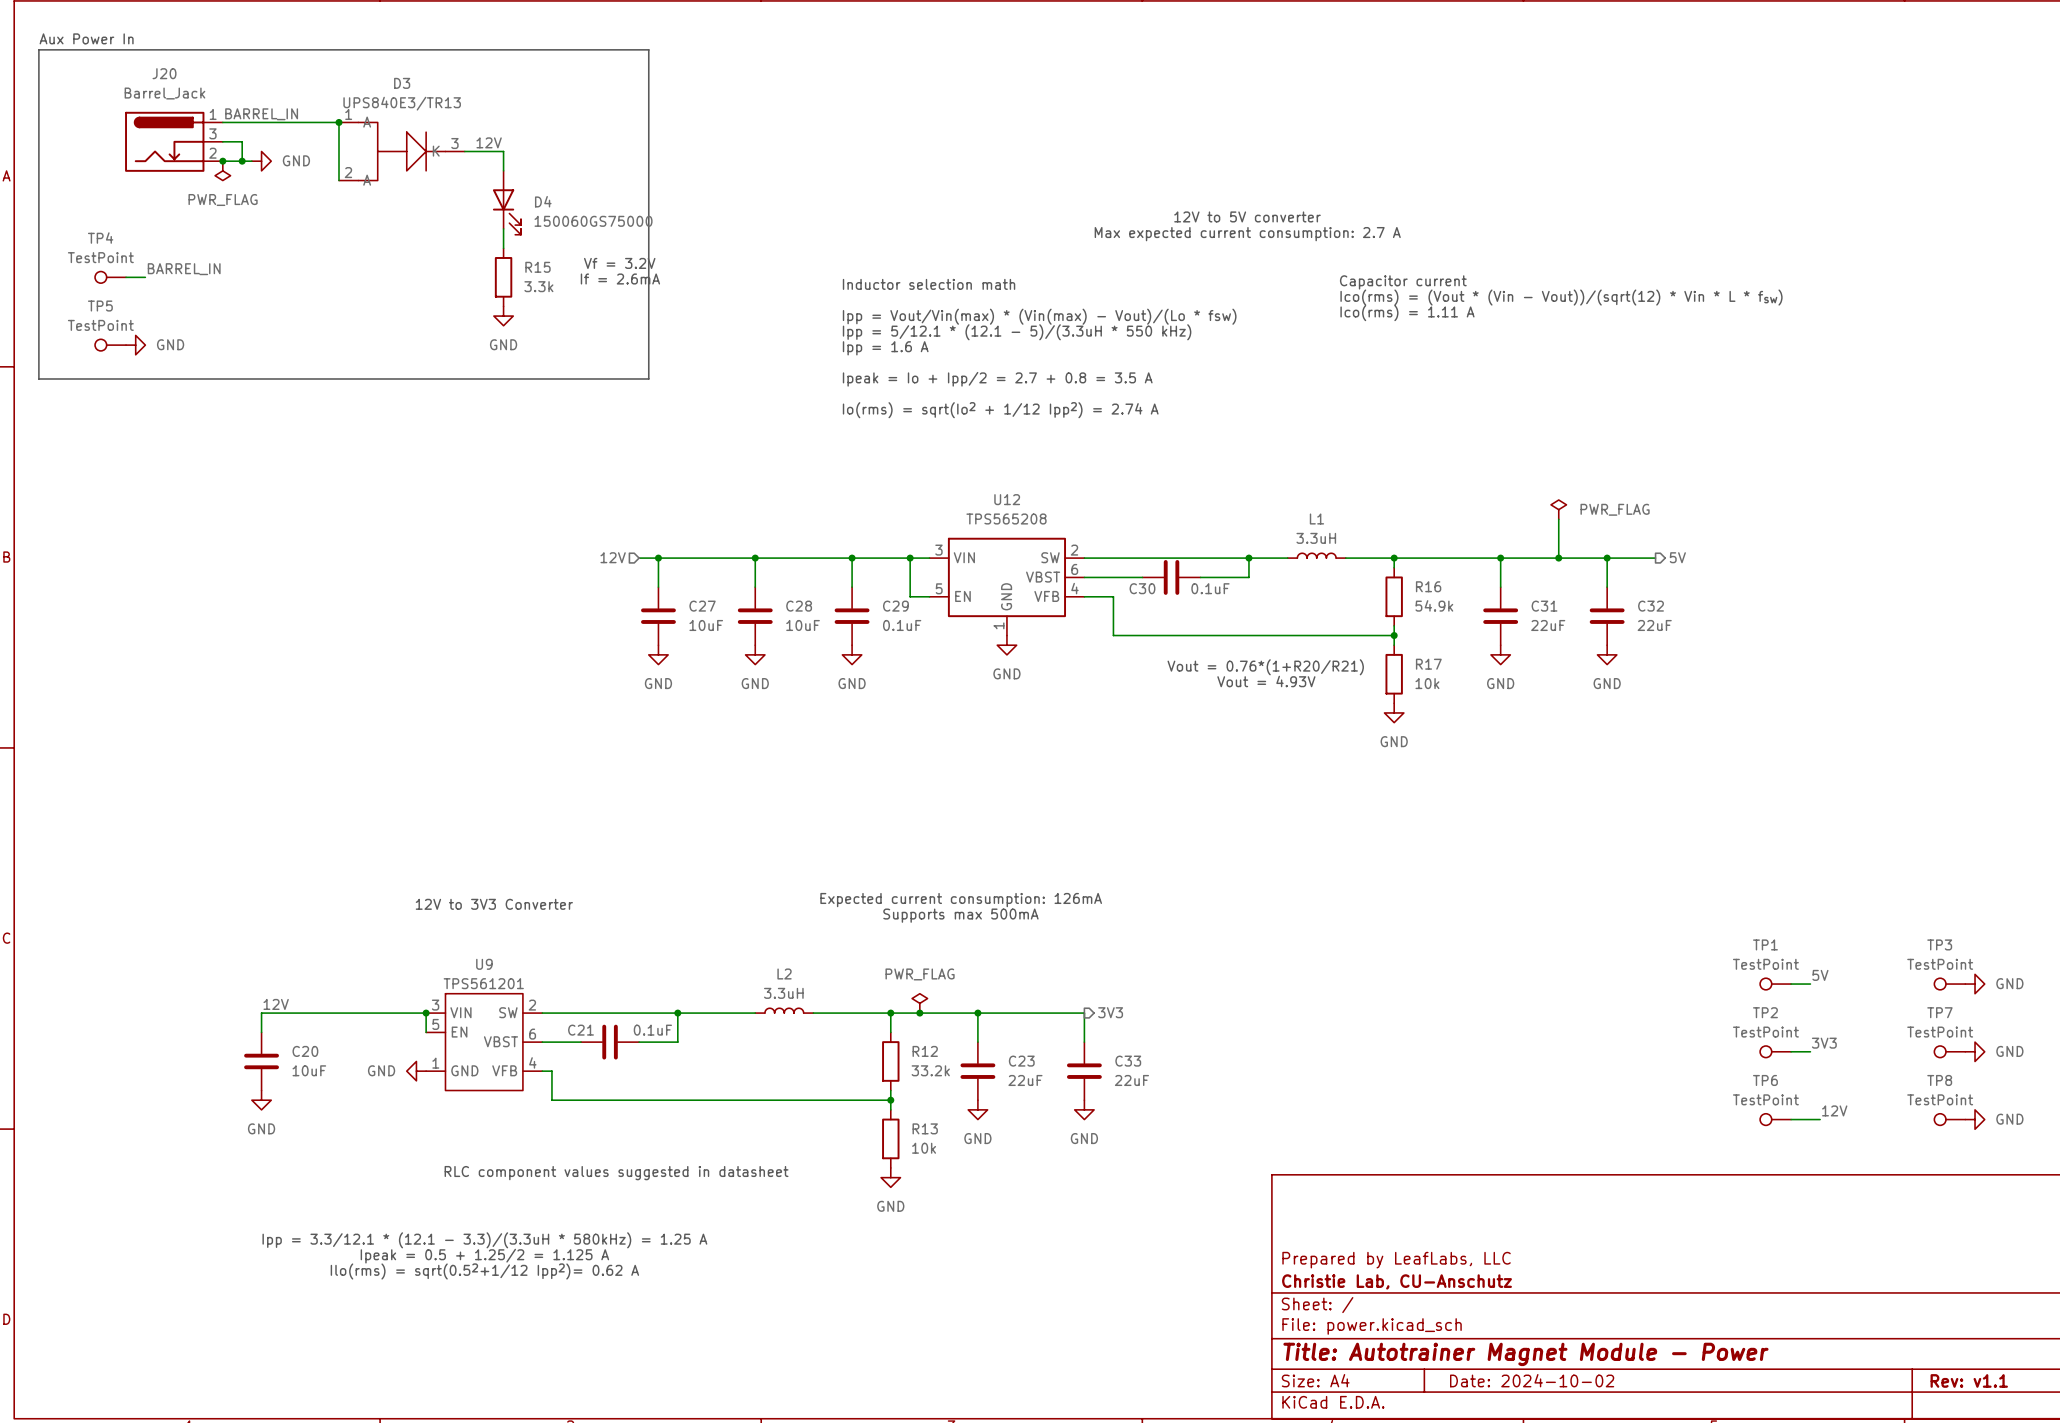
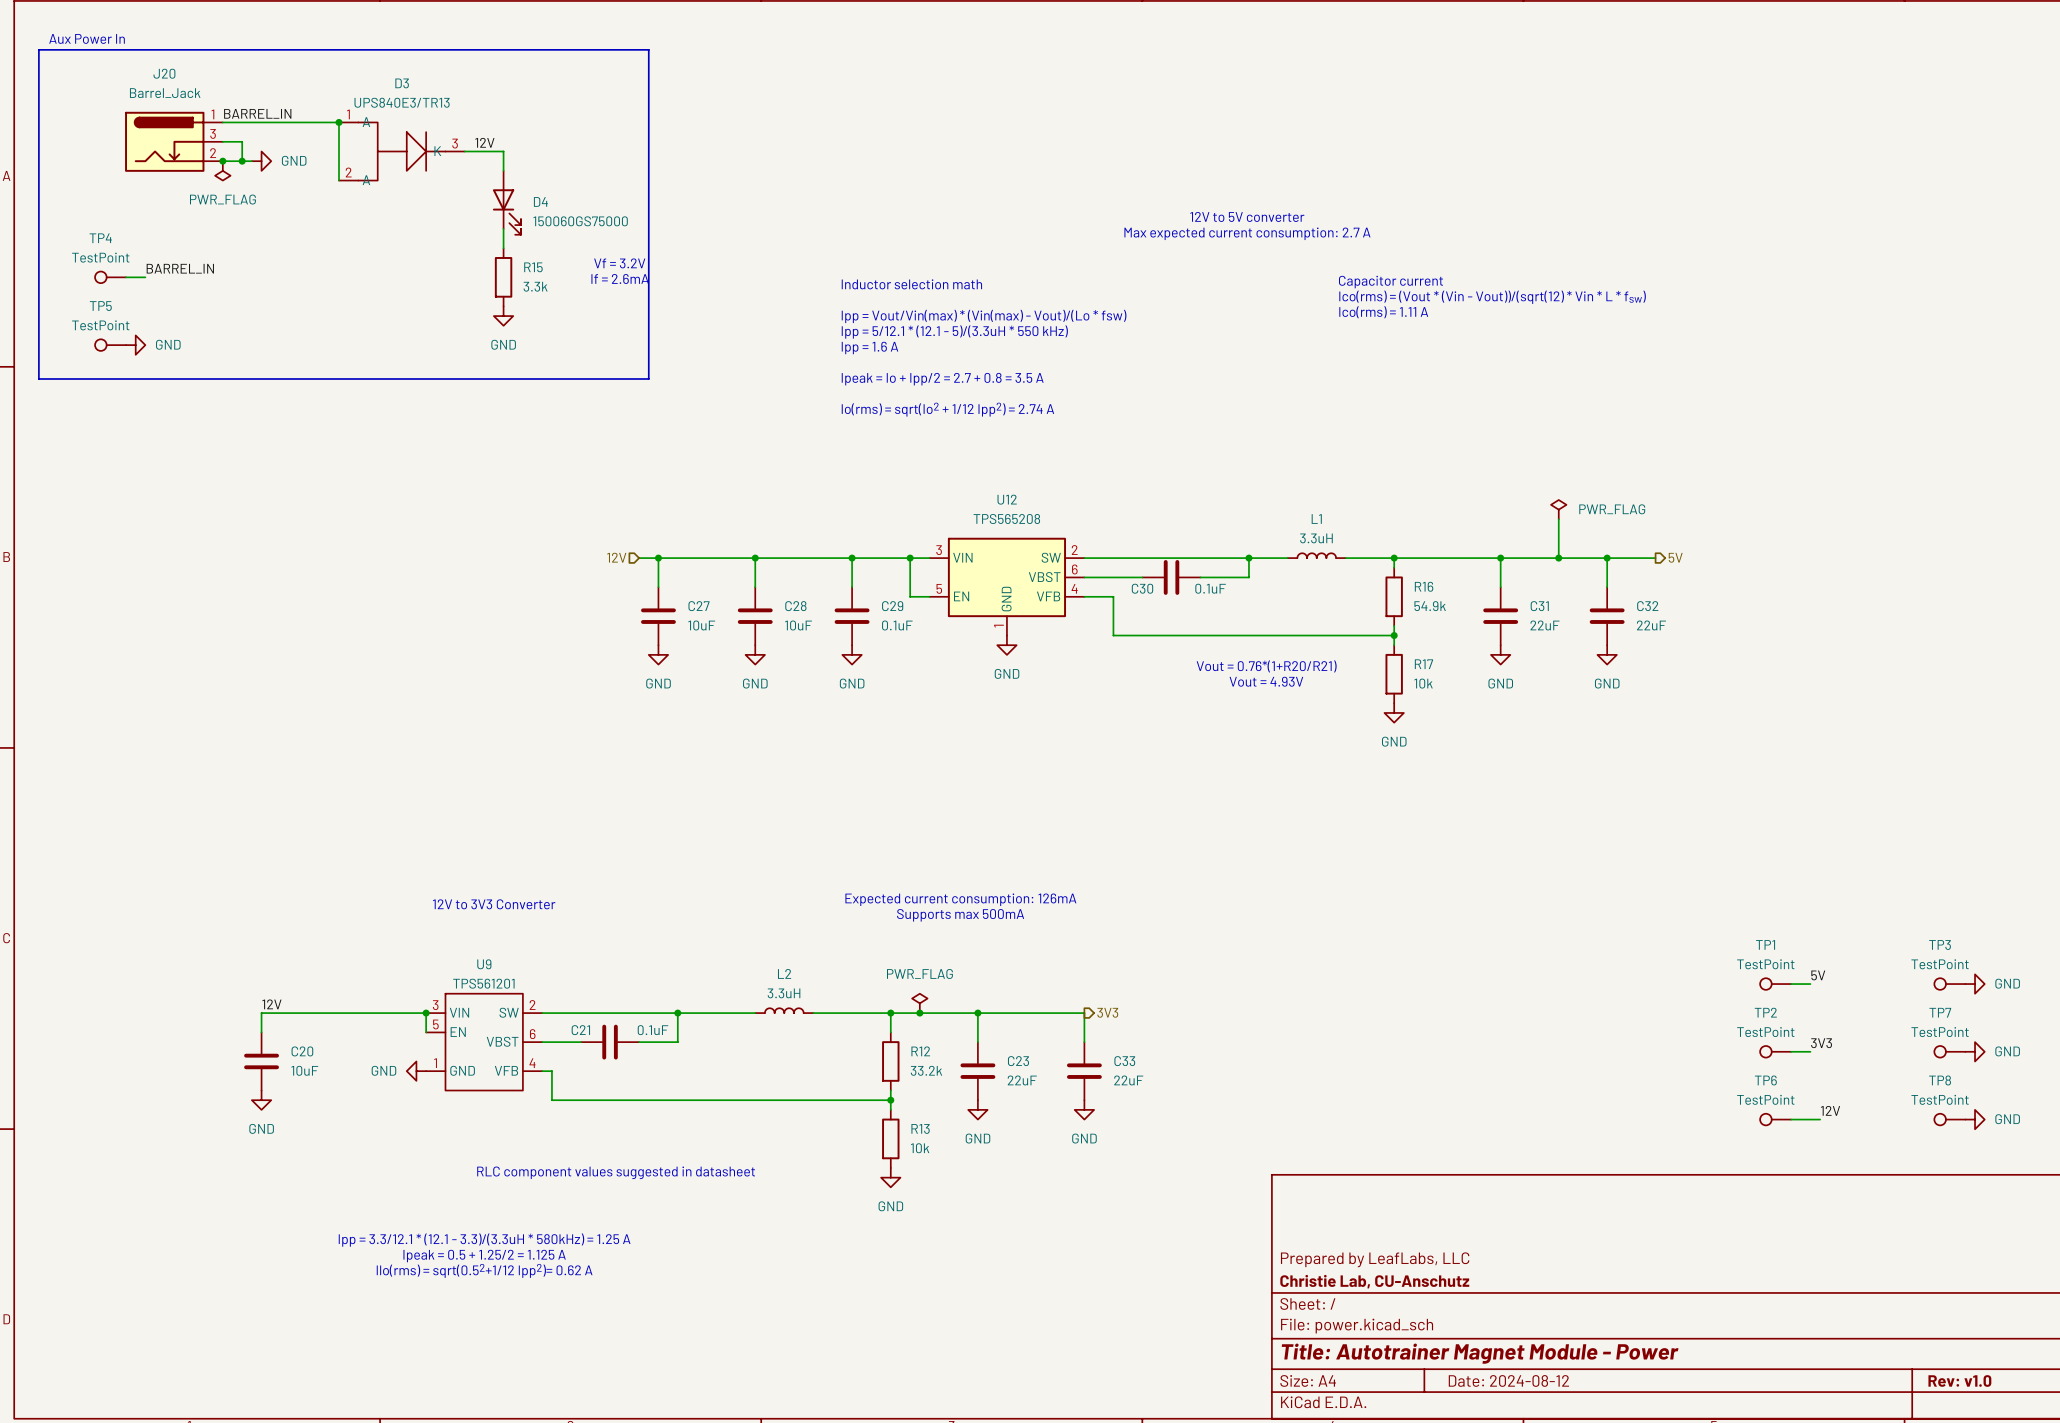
title block: Date: 2024-10-02 (1532, 1380) -> Date: 2024-08-12 (1508, 1380)
title block: Rev: v1.1 (1969, 1380) -> Rev: v1.0 (1959, 1380)

